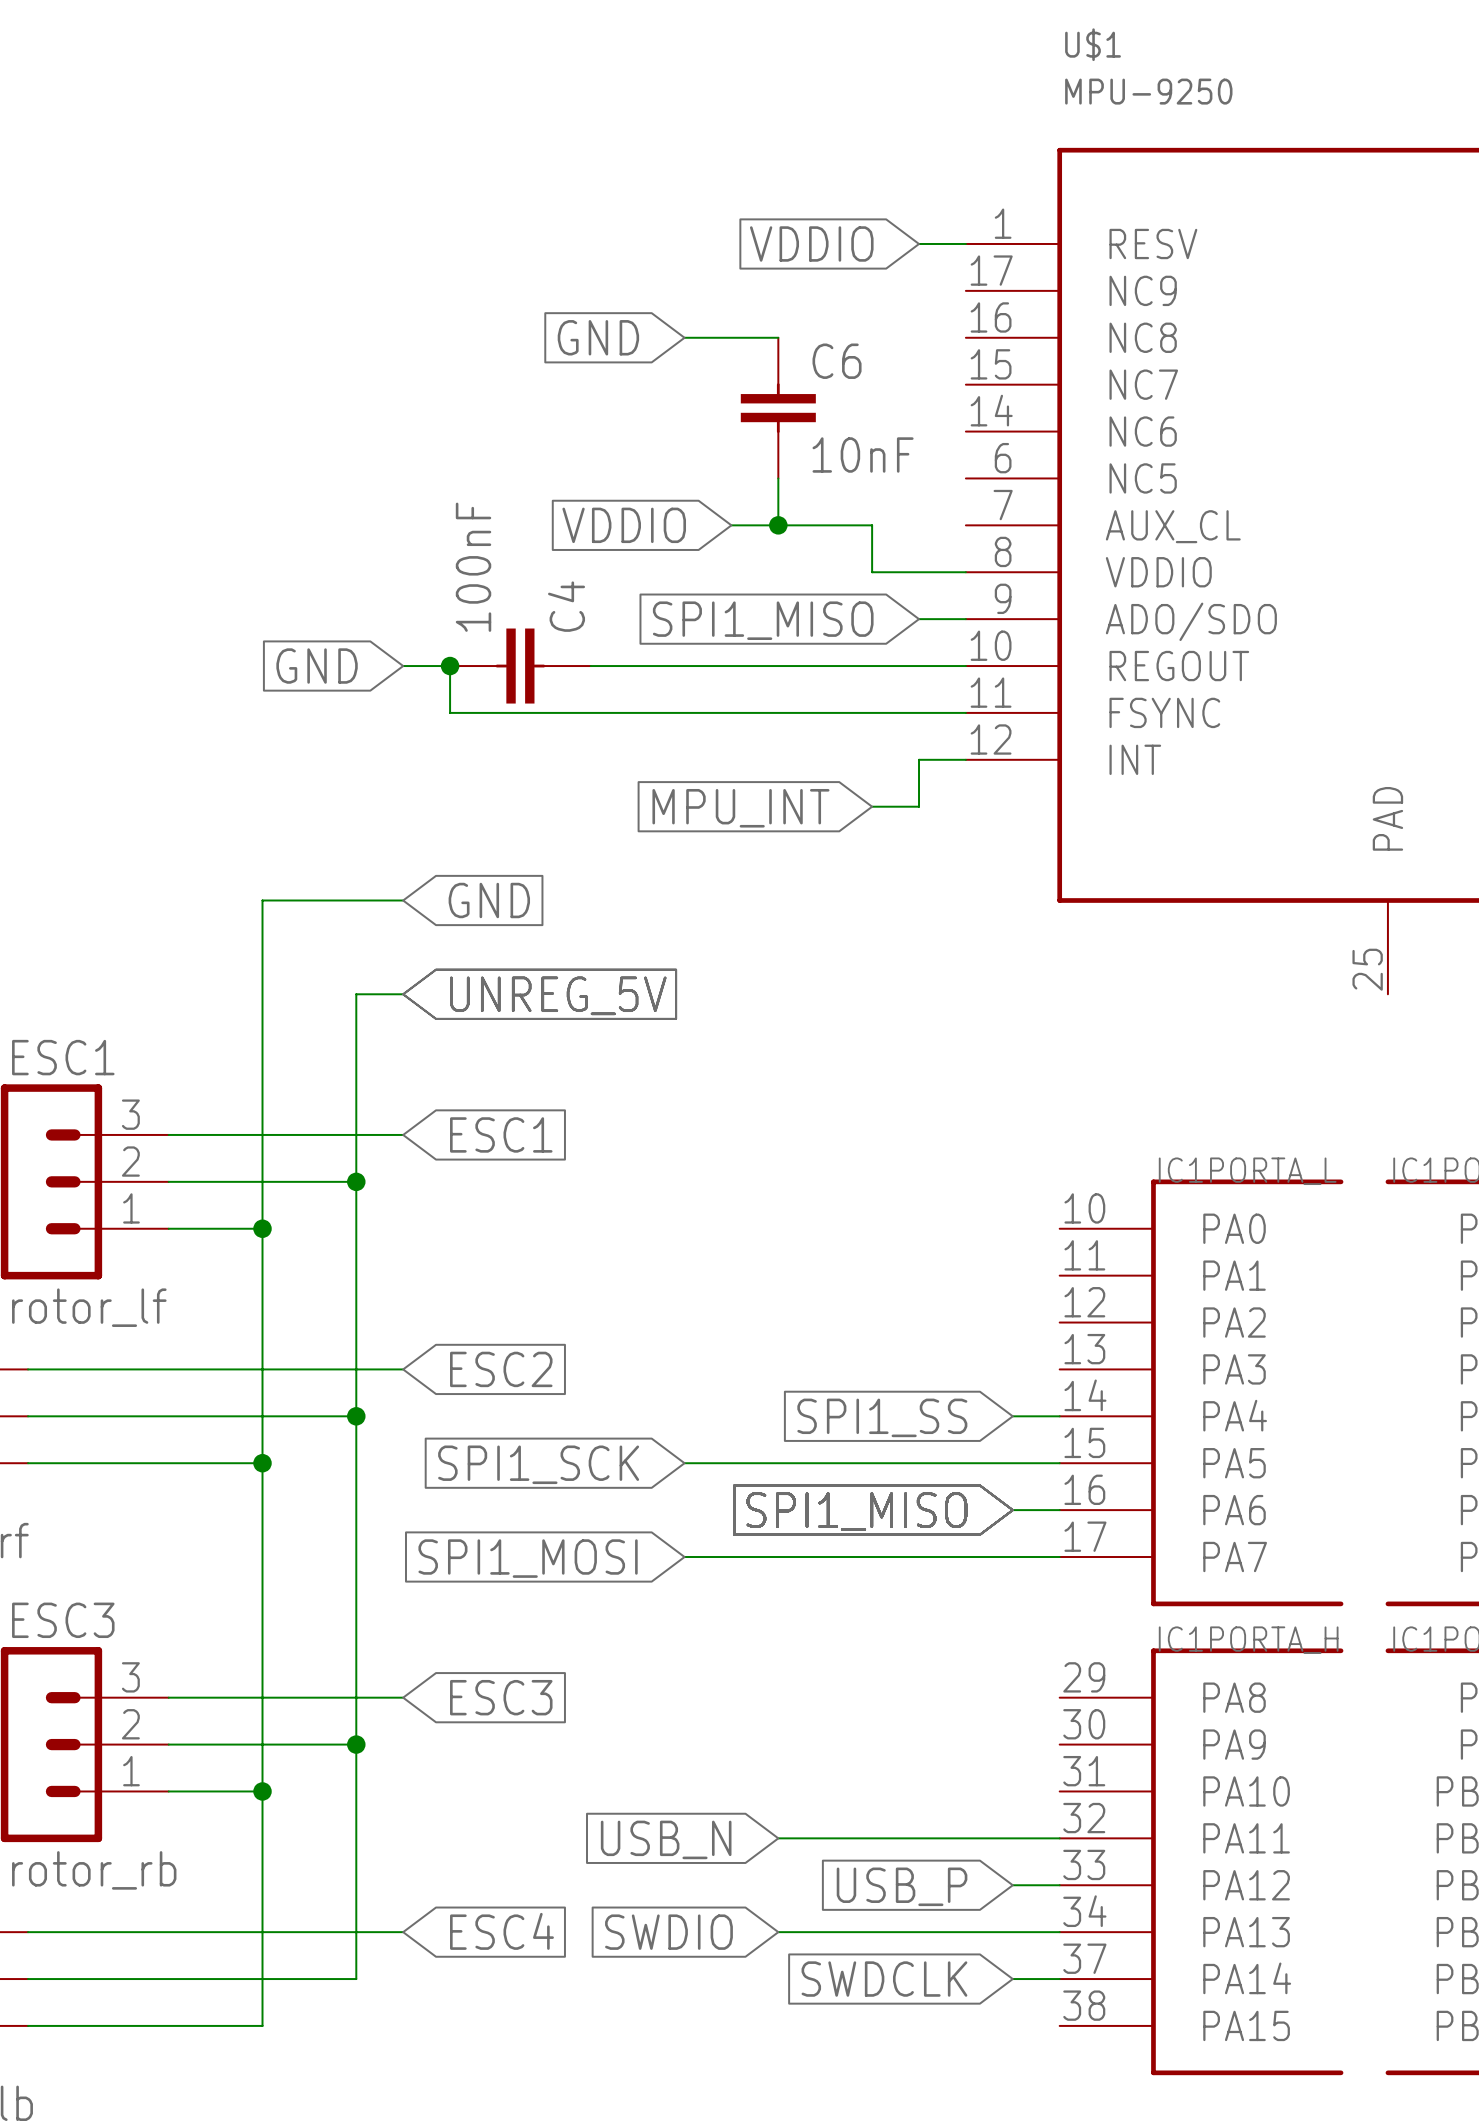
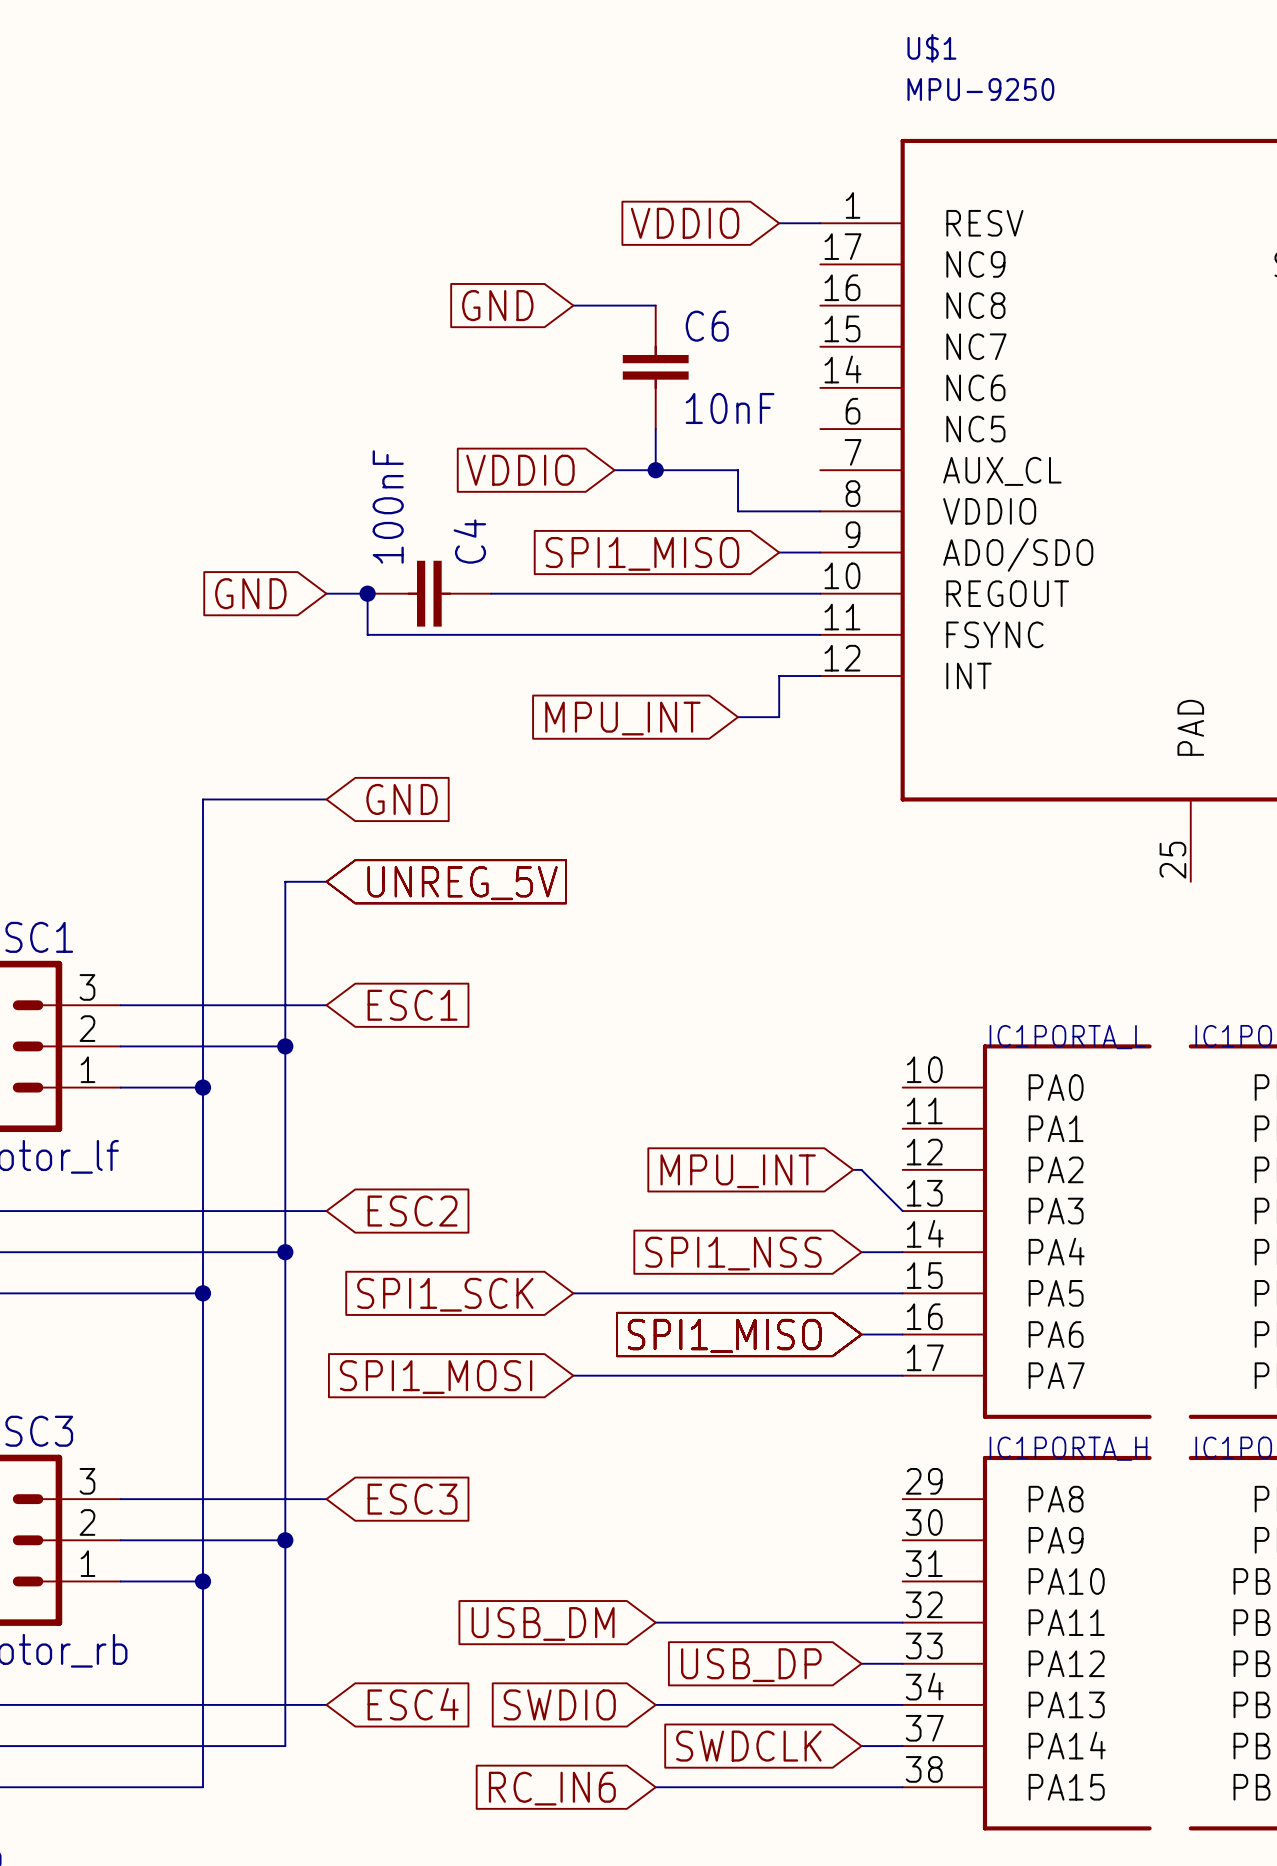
wire: none -> (853, 1169) (861, 1169) (902, 1211)
global label: none -> MPU_INT (738, 1171)
global label: SPI1_SS (882, 1417) -> SPI1_NSS (733, 1253)
global label: USB_N (666, 1839) -> USB_DM (543, 1623)
global label: USB_P (902, 1886) -> USB_DP (751, 1665)
wire: none -> (655, 1787) (902, 1787)
global label: none -> RC_IN6 (552, 1788)

